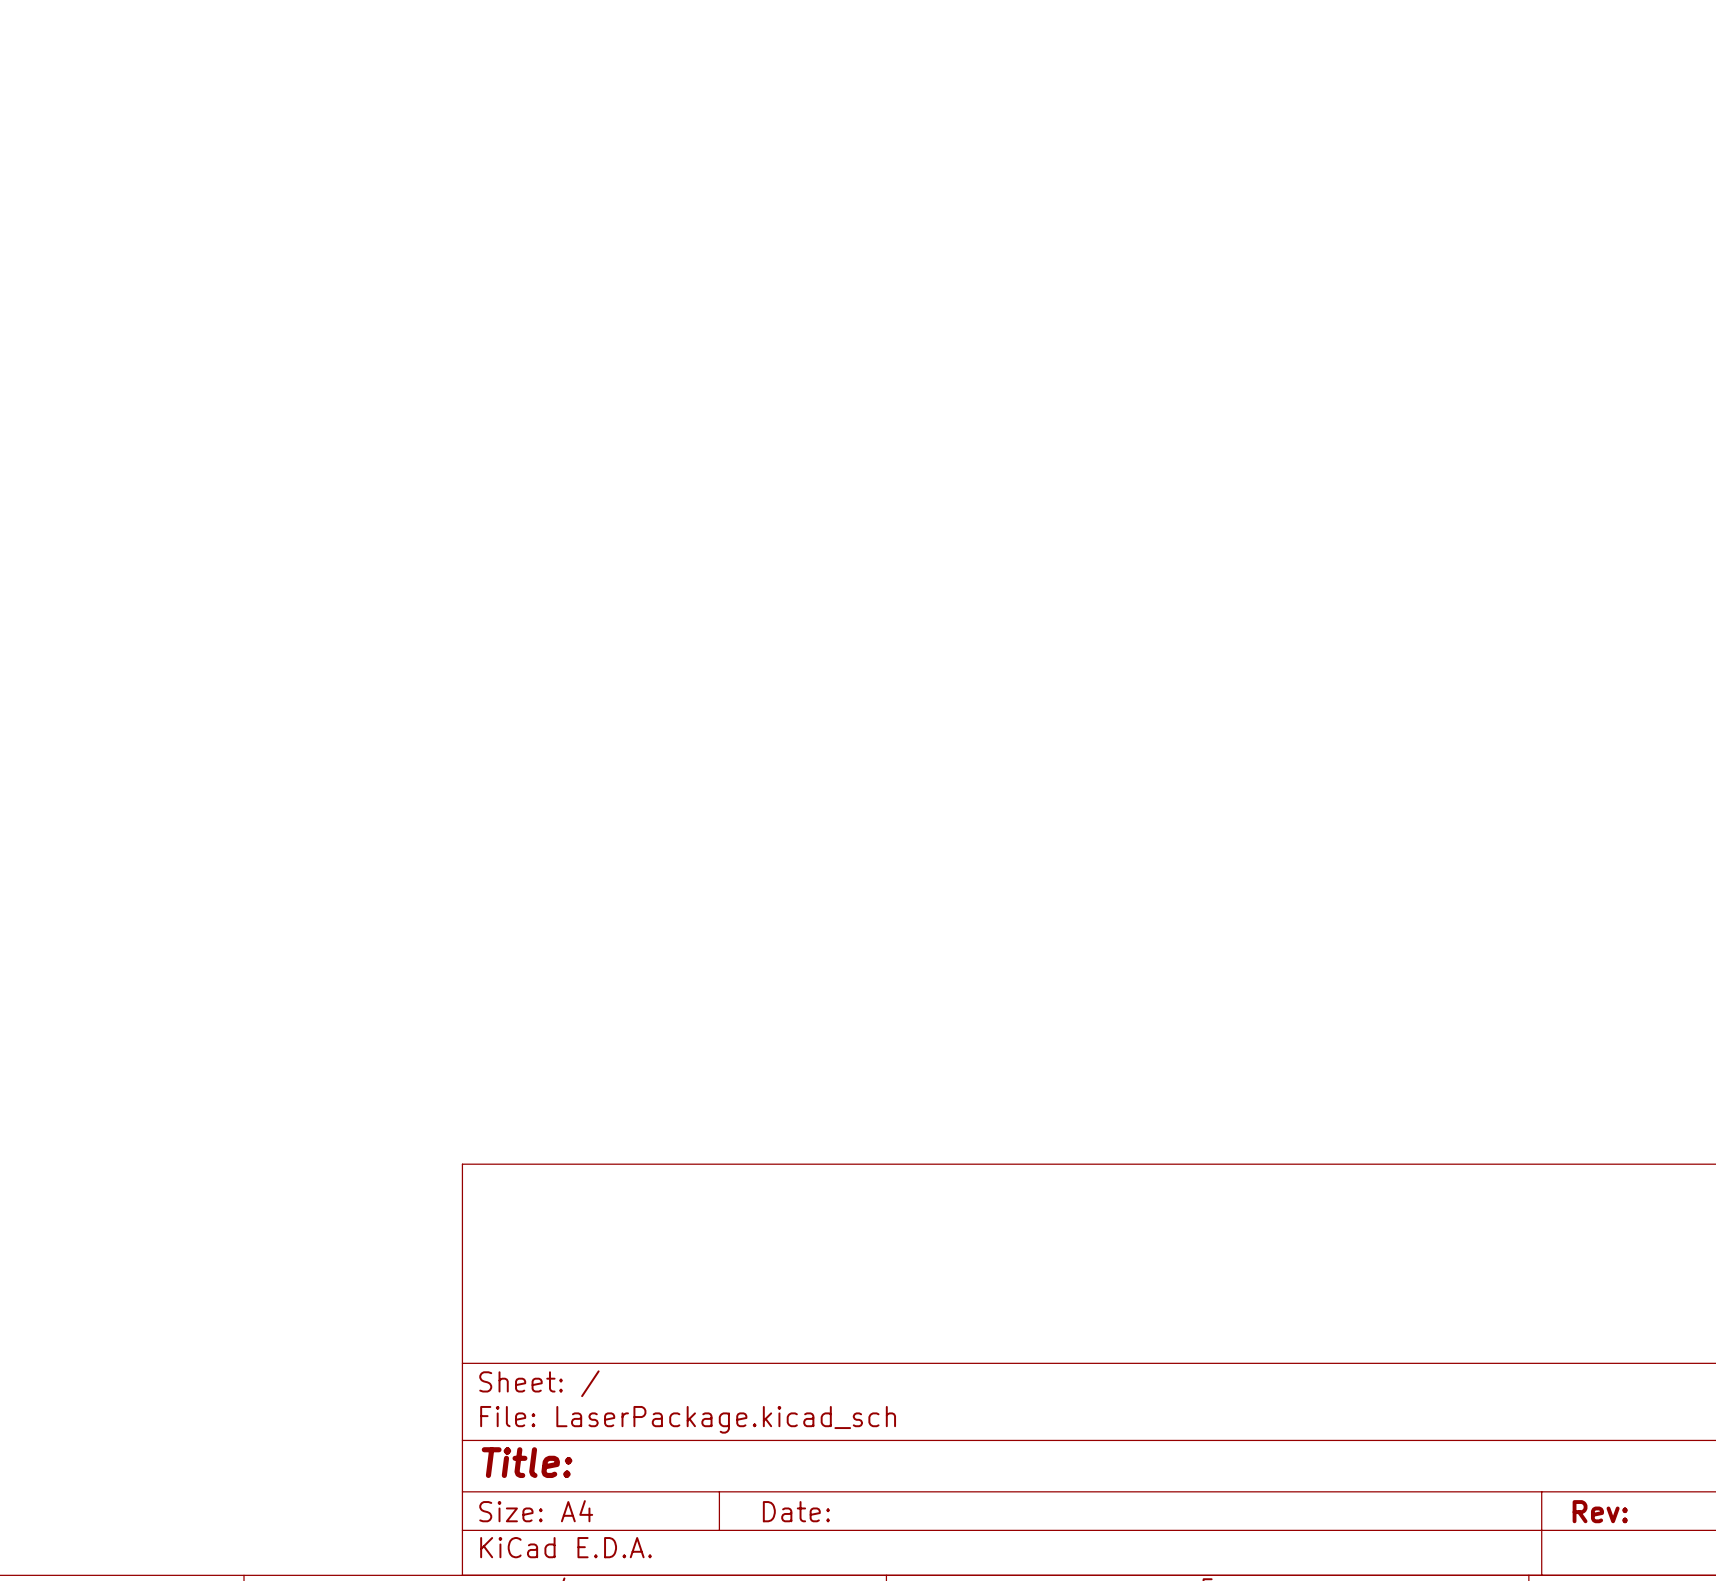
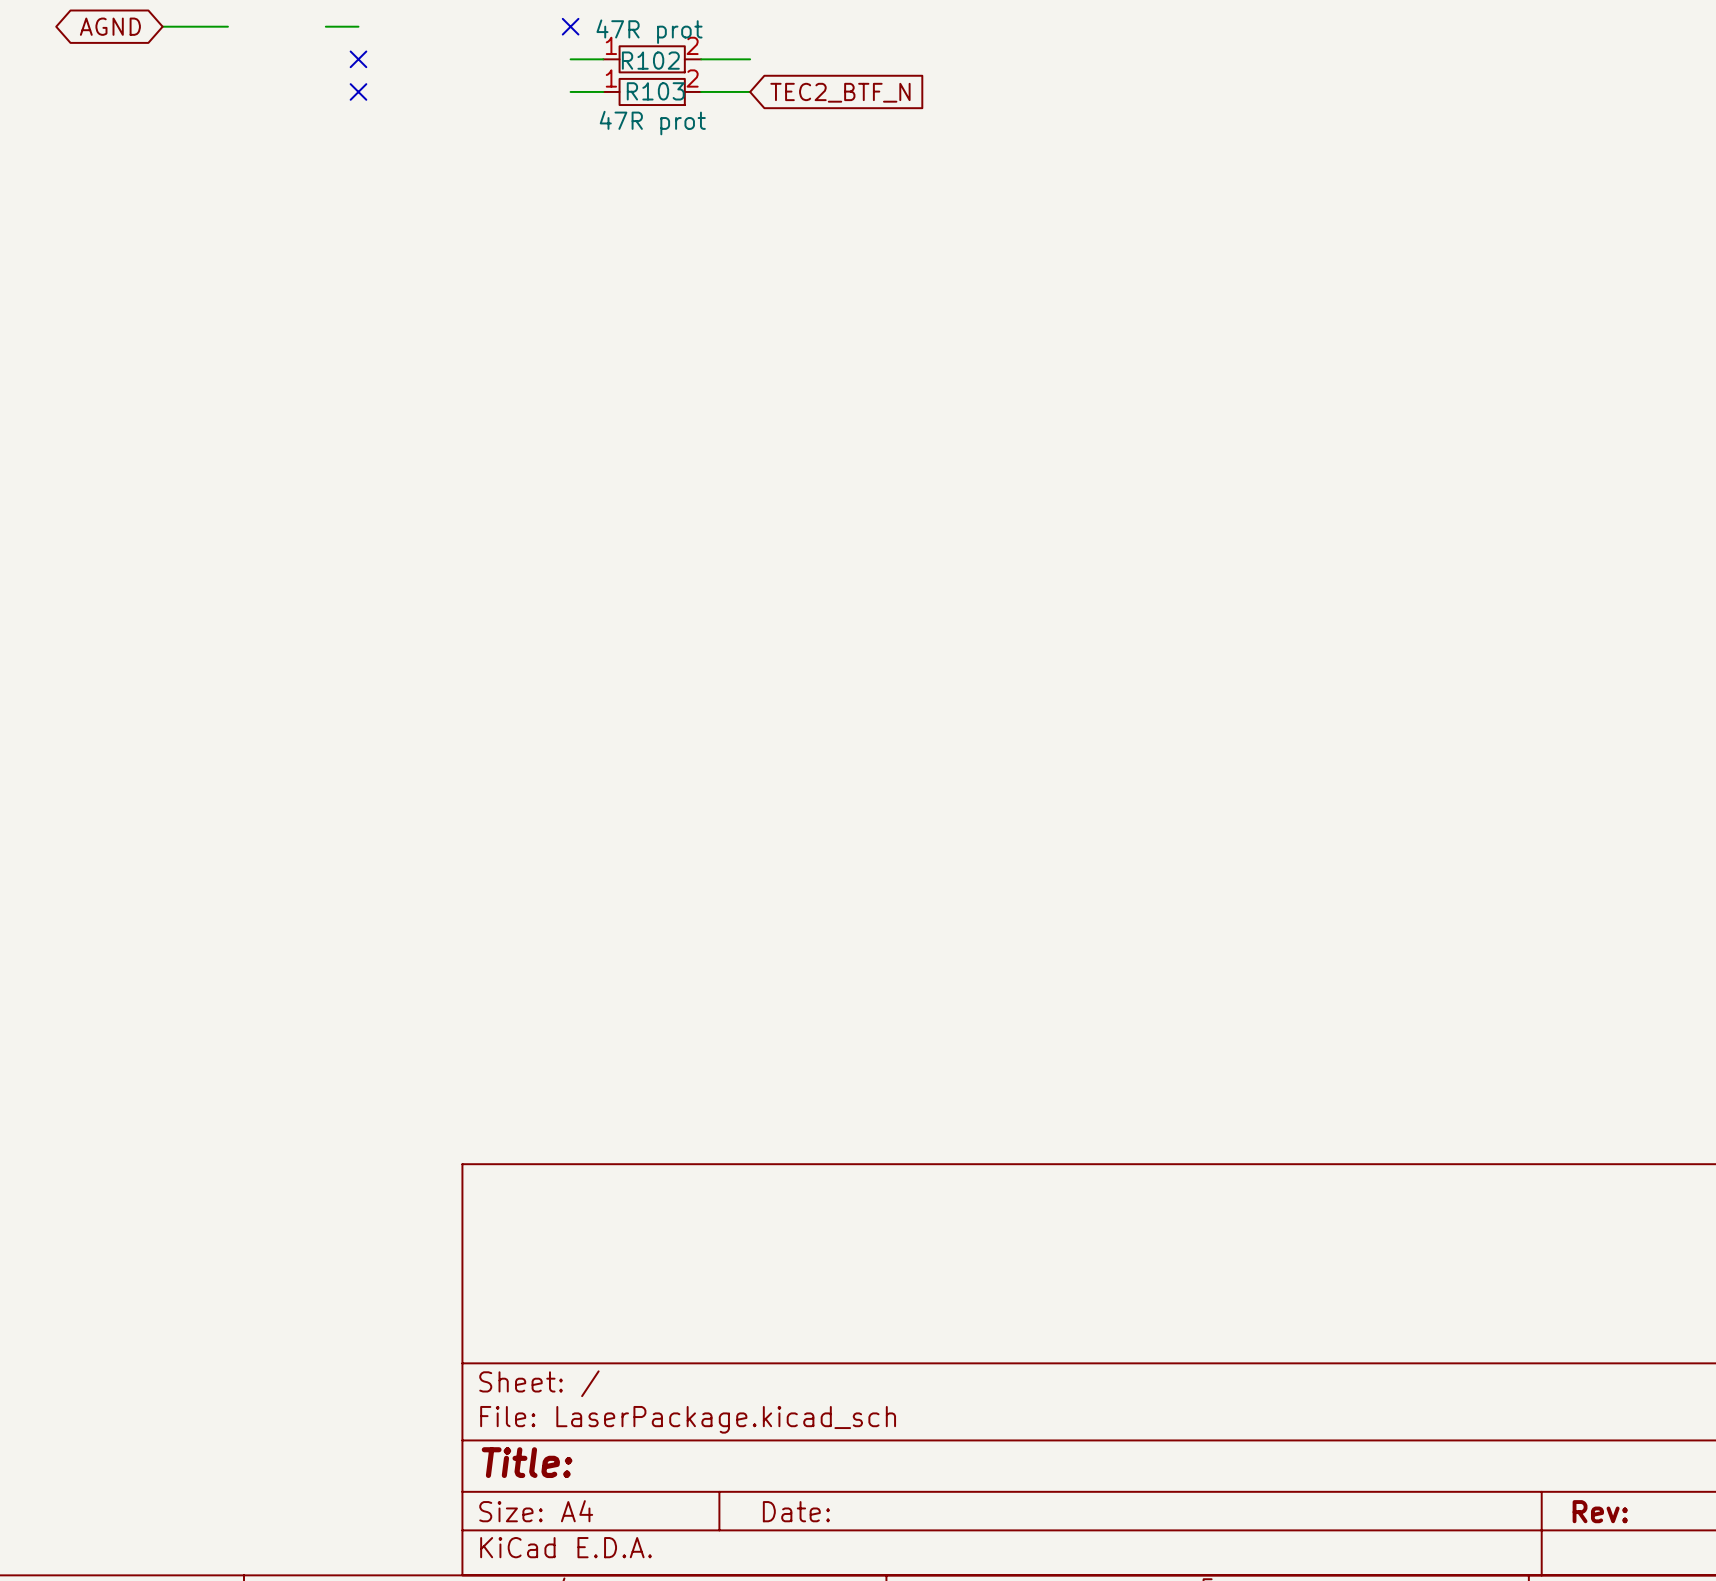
global label: none -> AGND (110, 26)
wire: none -> (162, 26) (227, 26)
wire: none -> (325, 26) (358, 26)
no-connect mark: none -> (570, 26)
no-connect mark: none -> (358, 59)
wire: none -> (570, 59) (603, 59)
R102: none -> 47R prot (652, 59)
wire: none -> (701, 59) (750, 59)
no-connect mark: none -> (358, 91)
wire: none -> (570, 91) (603, 91)
R103: none -> 47R prot (652, 91)
wire: none -> (701, 91) (750, 91)
global label: none -> TEC2_BTF_N (840, 92)

